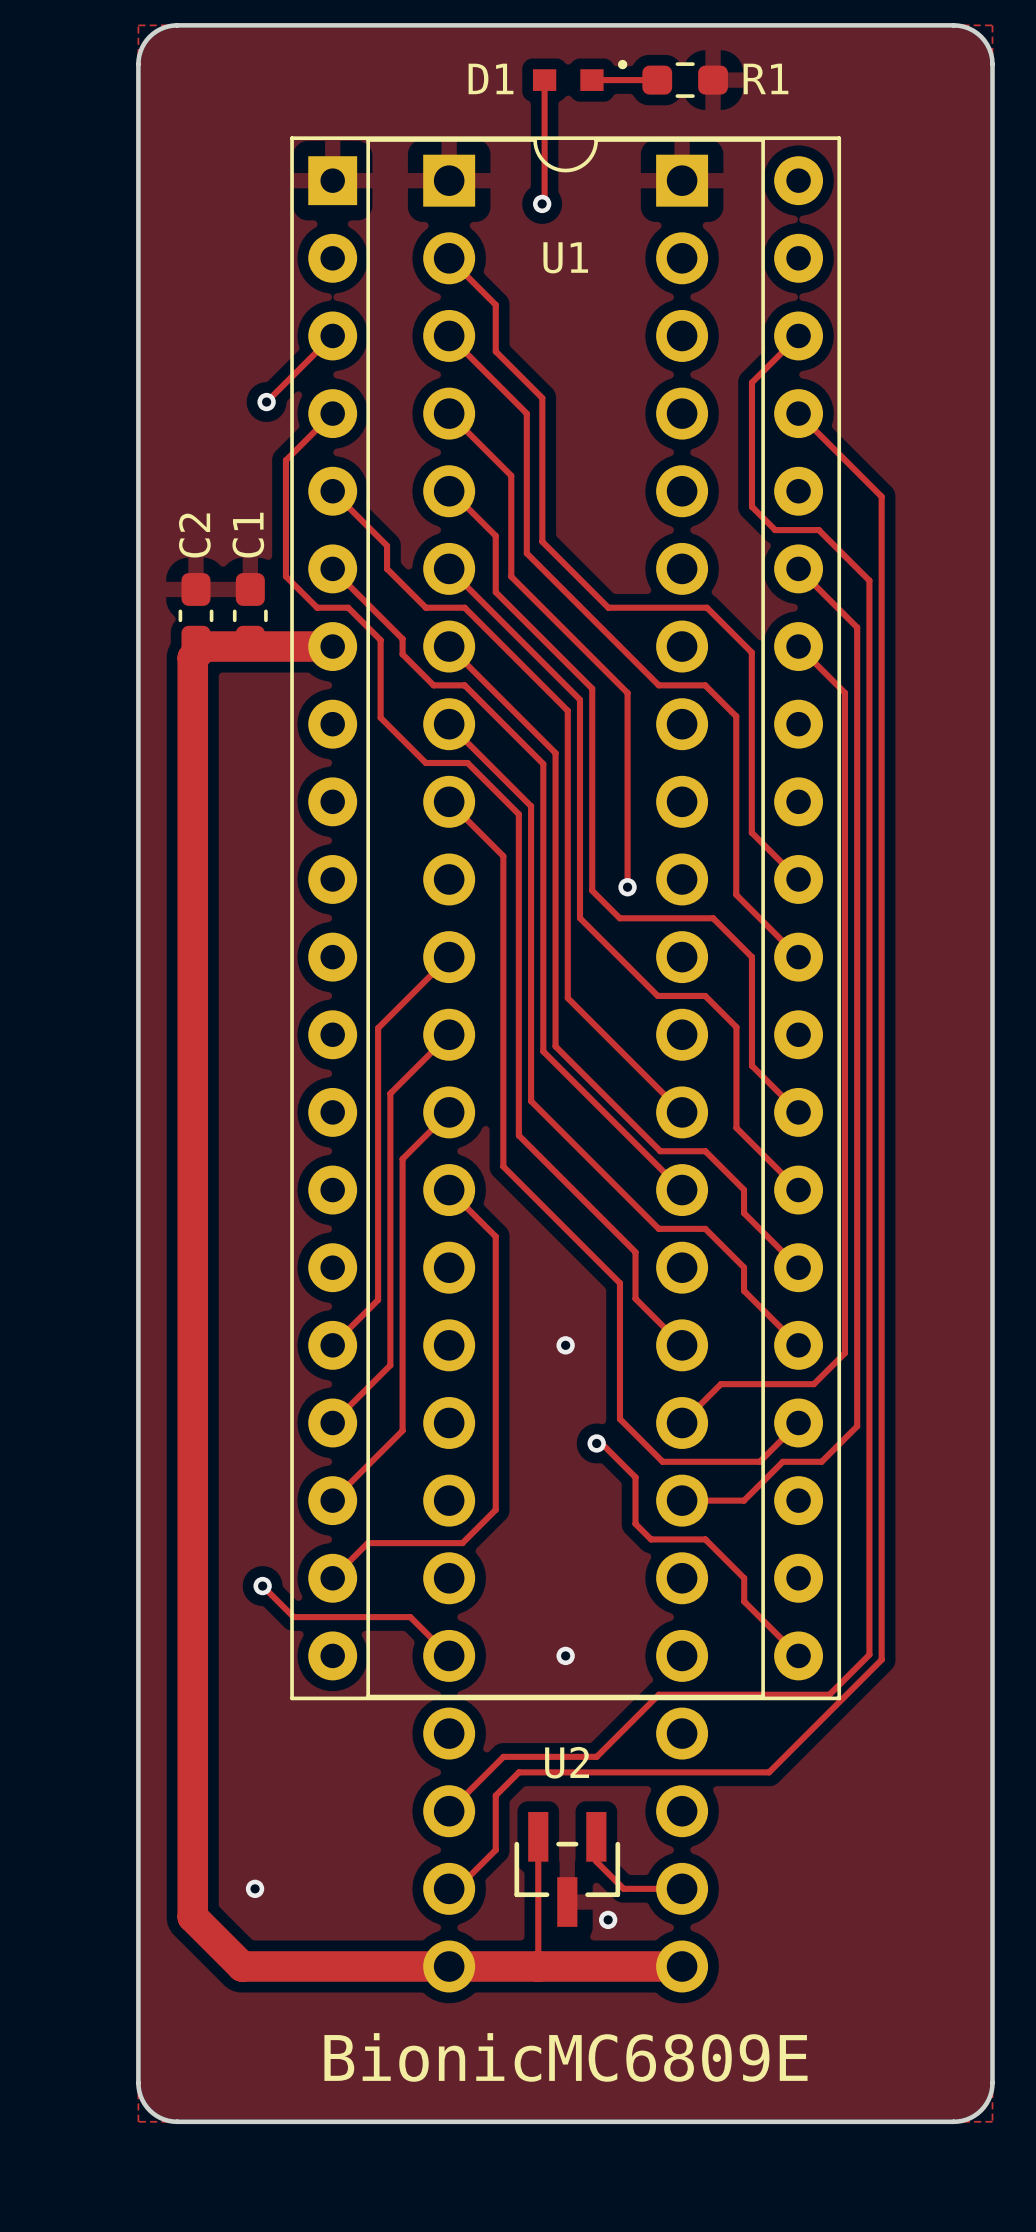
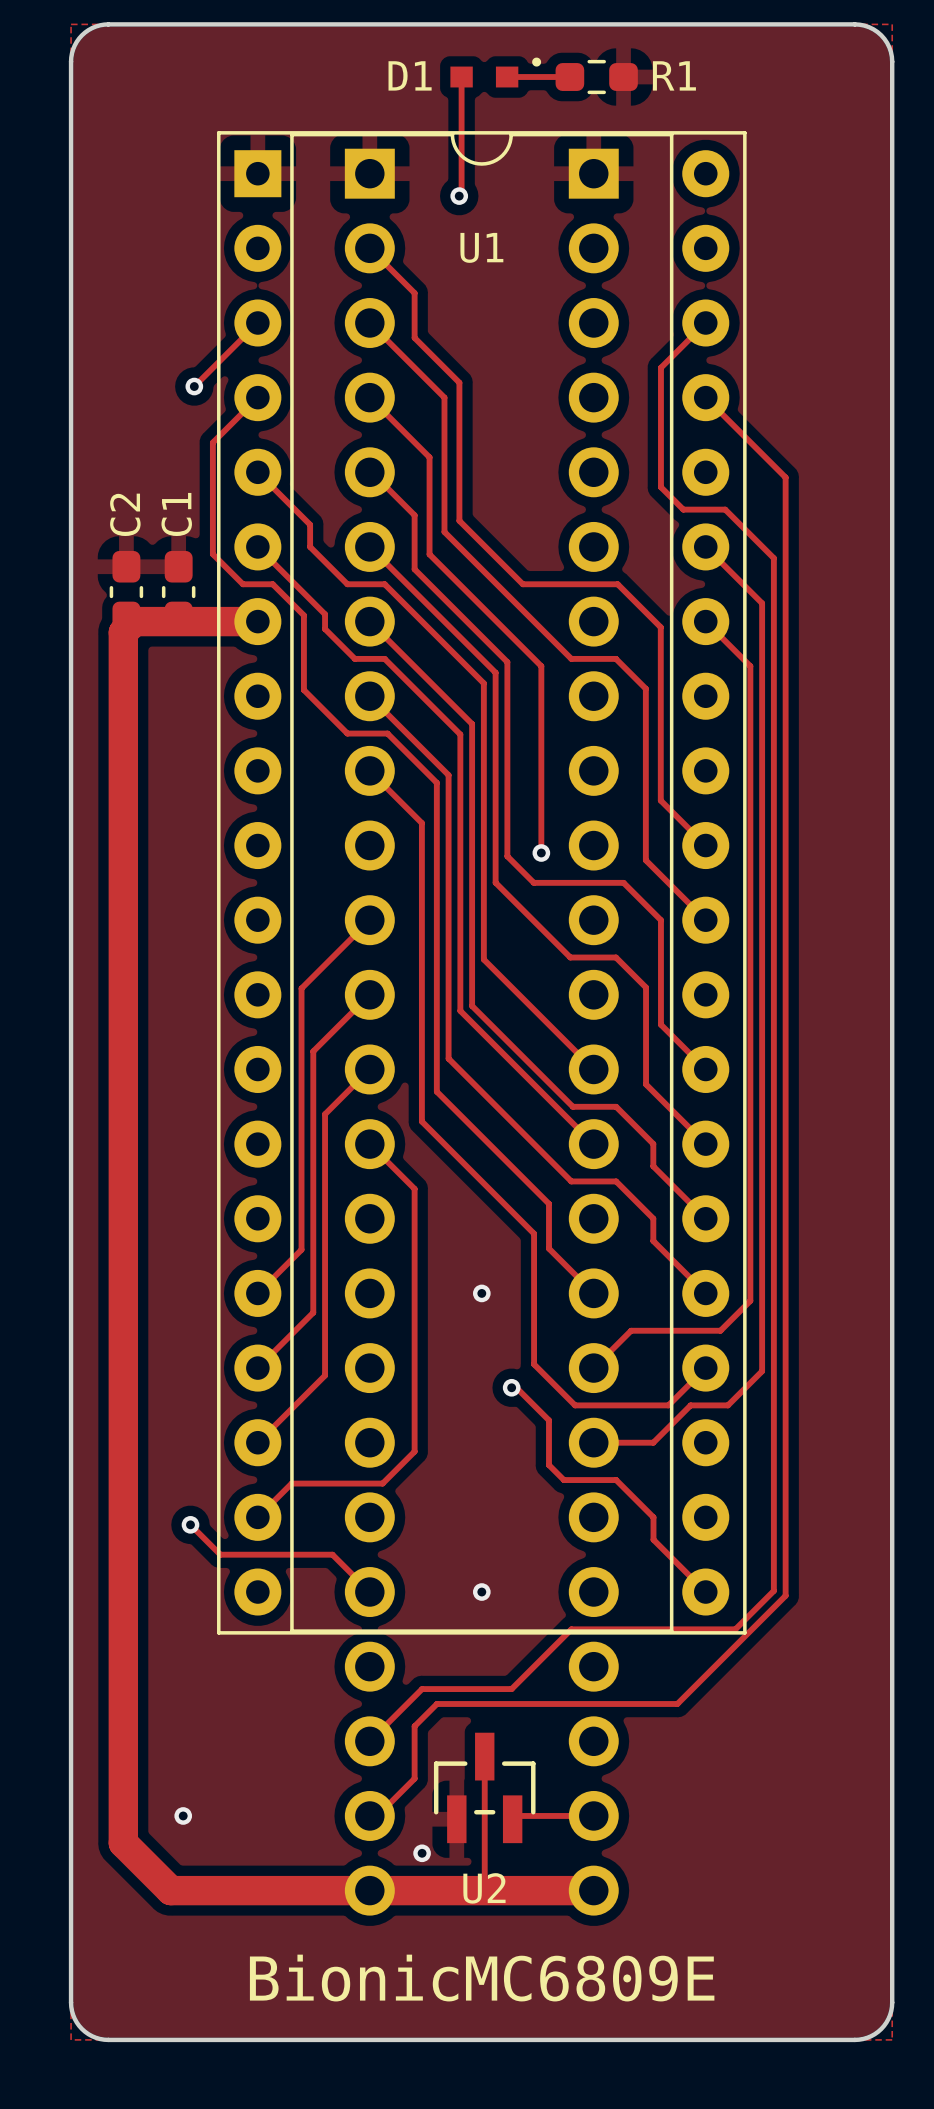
track: none -> (484, 1756) (484, 1890)
track: (538, 1836) (538, 1966) -> none
track: (596, 1836) (596, 1861) (623, 1888) -> (512, 1819) (515, 1815) (537, 1815)
U2 rotation: 0° (567, 1869) -> 180° (484, 1787)
via position: (608, 1919) -> (422, 1853)

